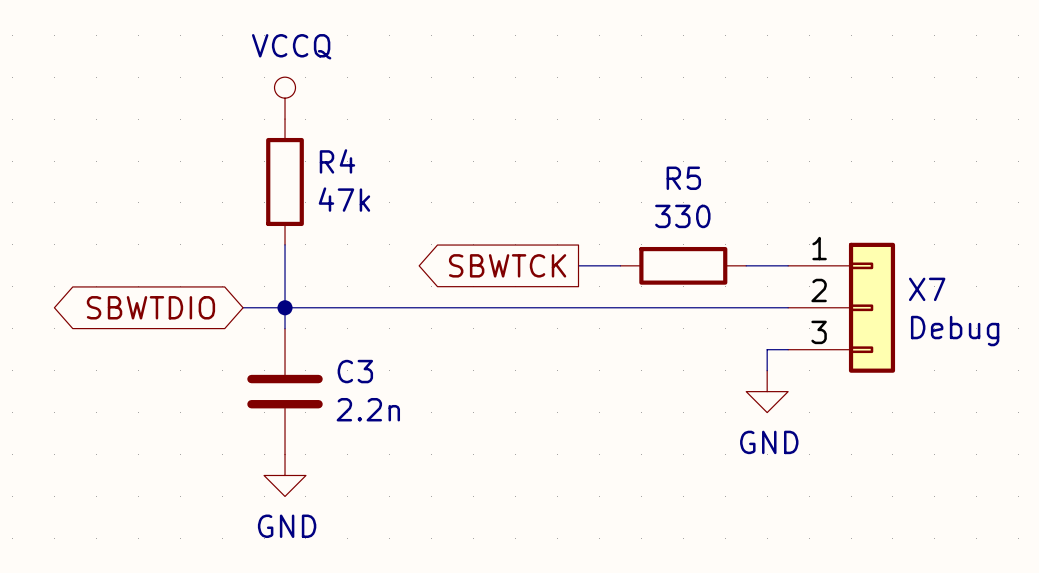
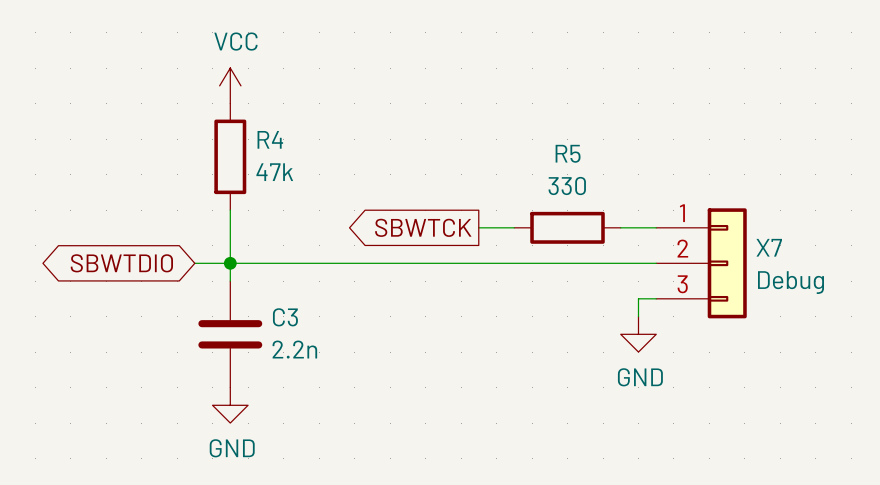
power symbol: VCCQ (285, 98) -> VCC (230, 85)

